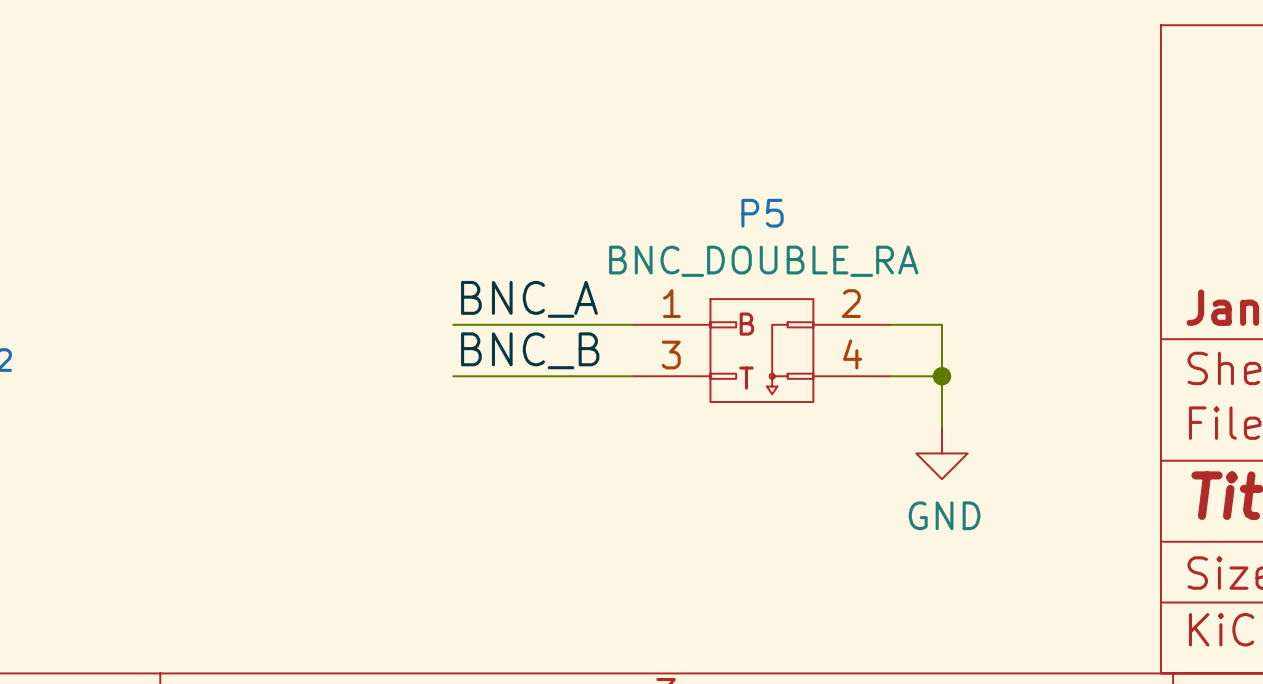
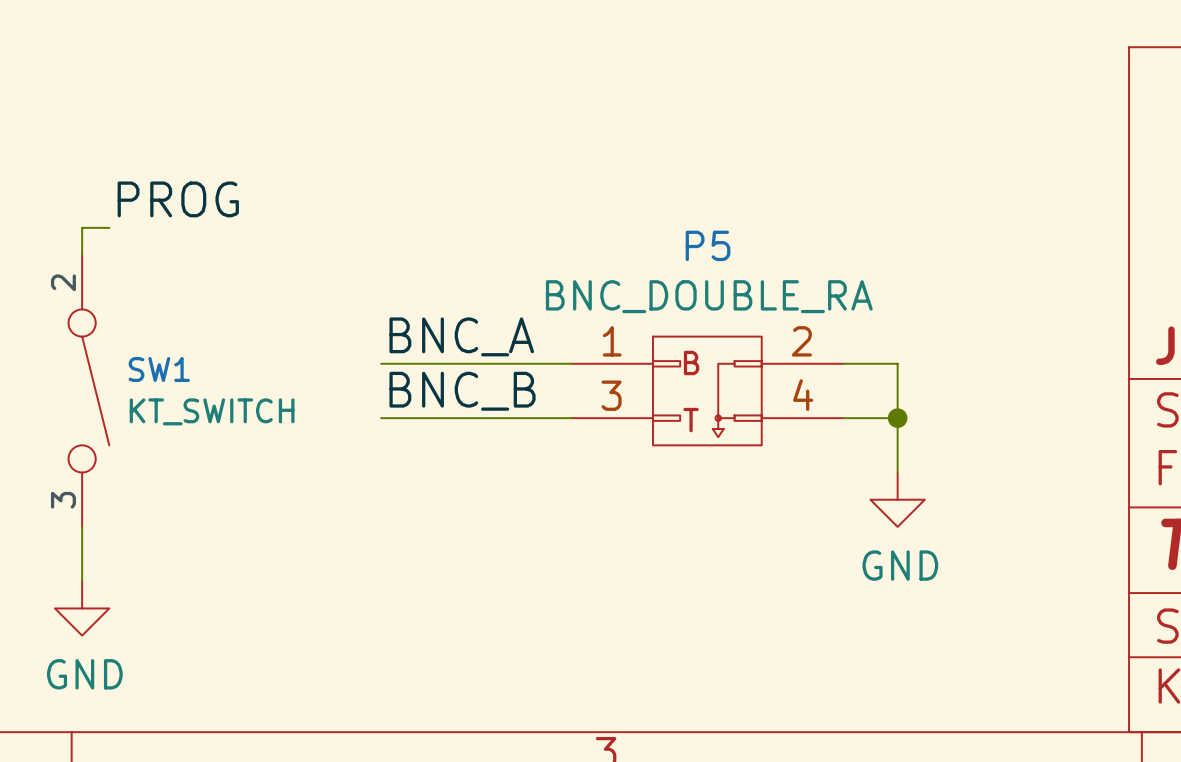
label: none -> PROG (178, 199)
wire: none -> (109, 227) (82, 227) (82, 255)
SW1: none -> KT_SWITCH (88, 390)
wire: none -> (82, 526) (82, 581)
power symbol: none -> GND (82, 608)

